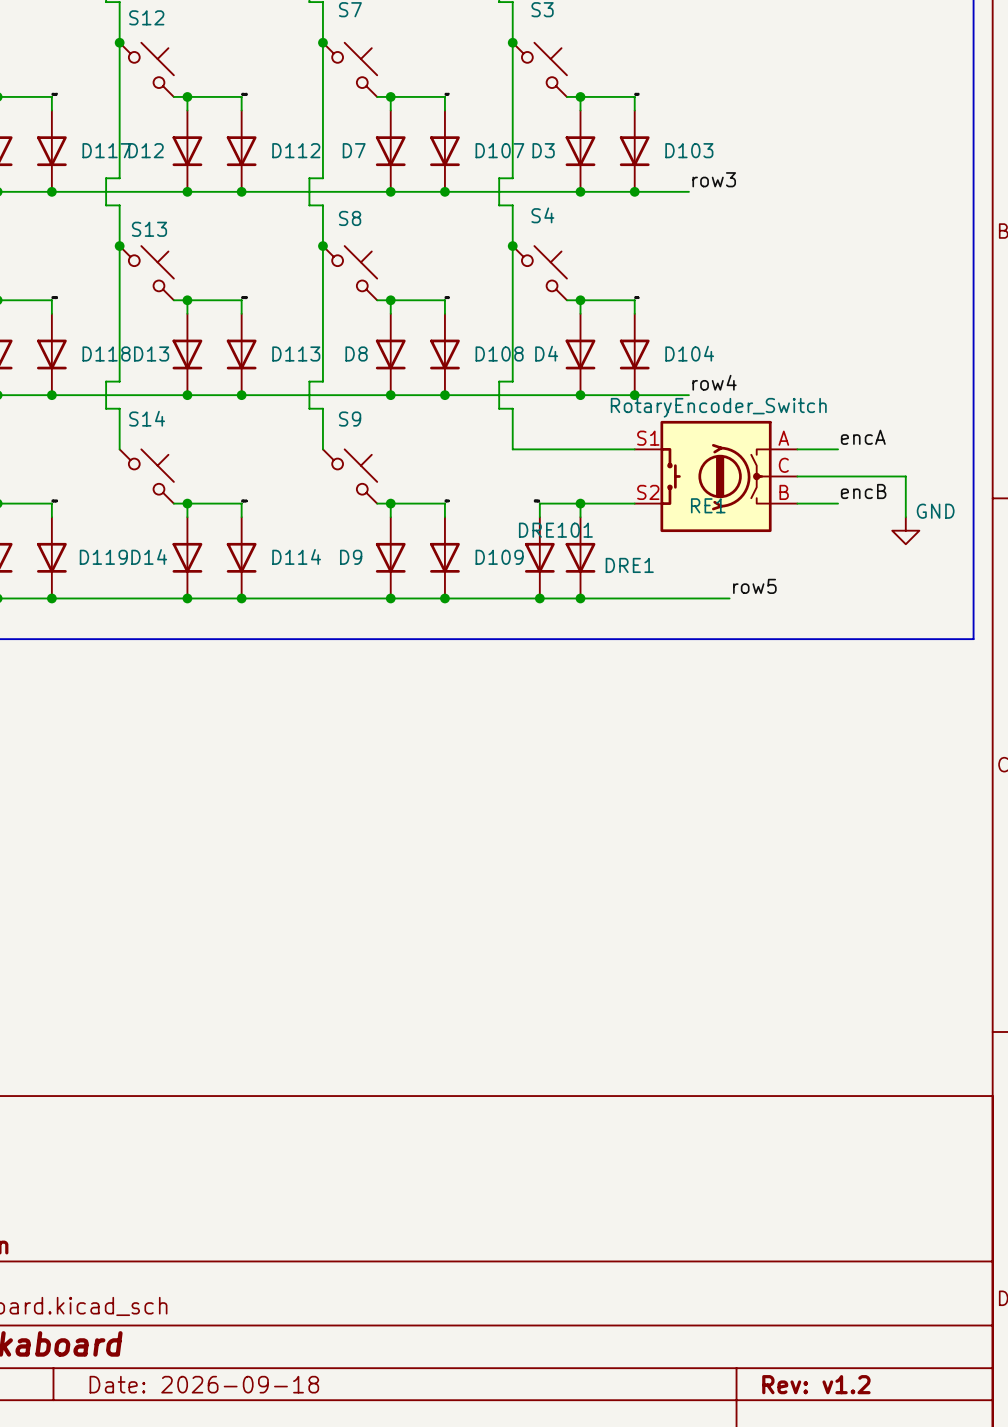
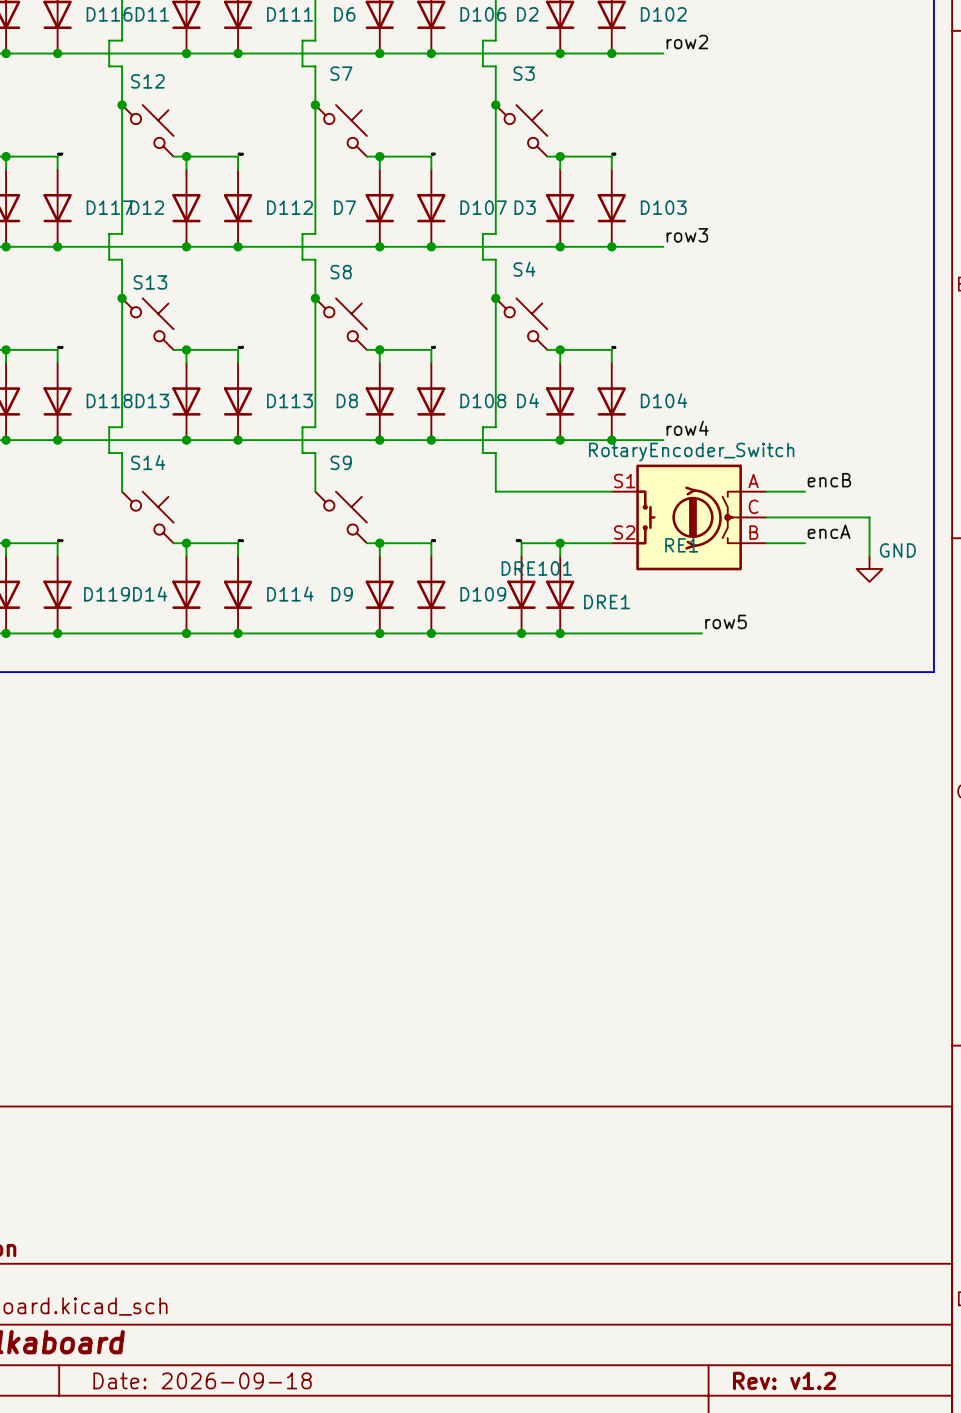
label: encA (863, 437) -> encB (829, 480)
label: encB (863, 491) -> encA (829, 531)

